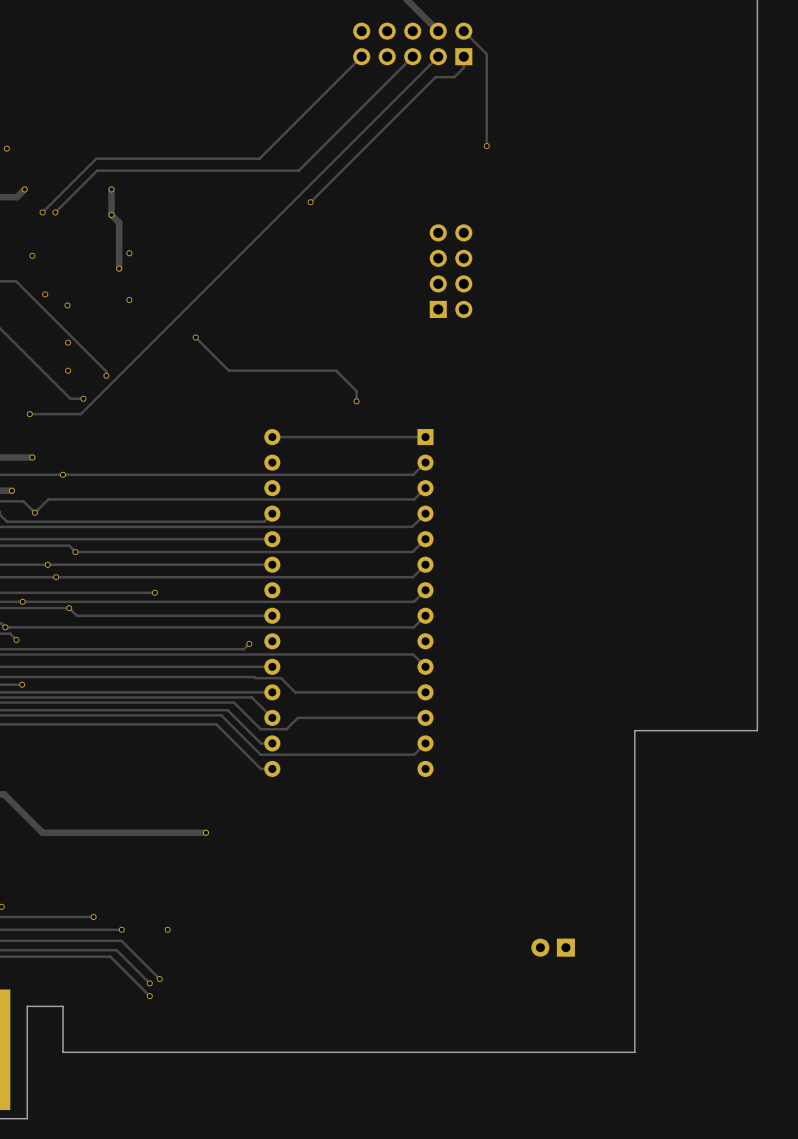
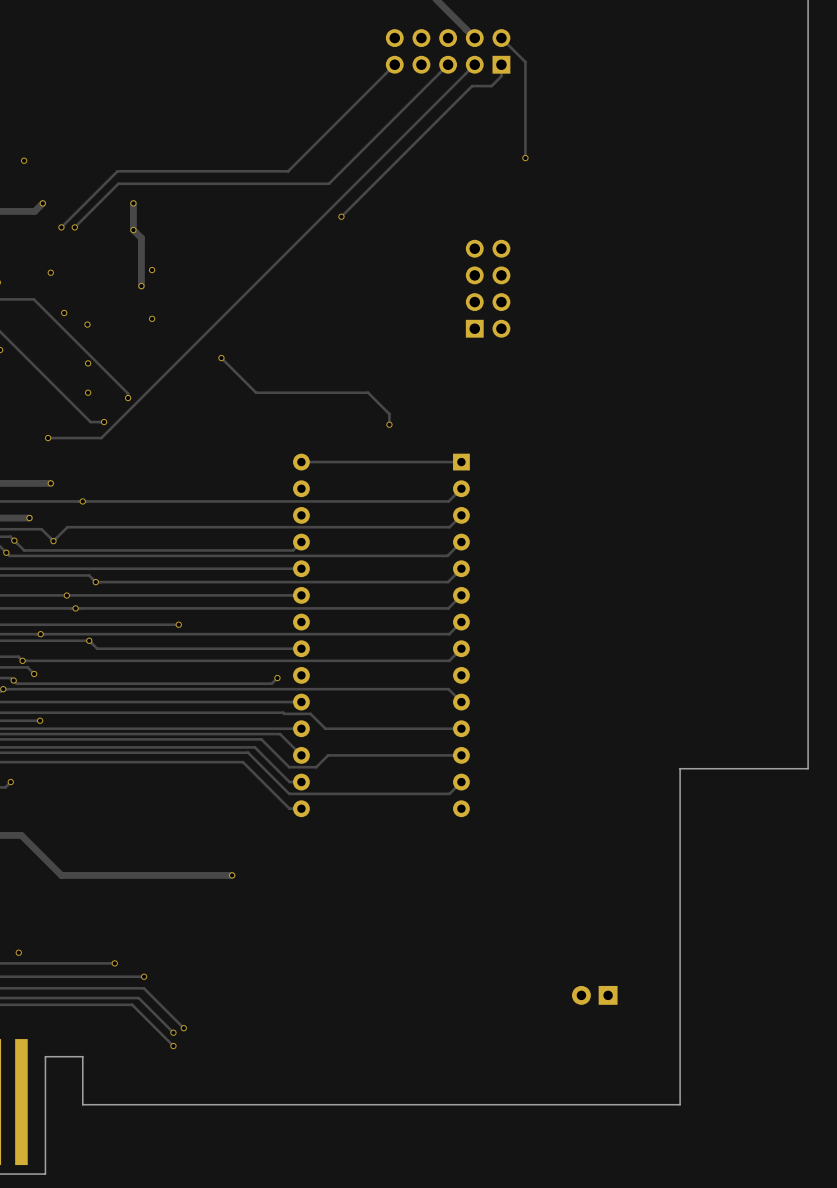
via: (167, 929) -> none

